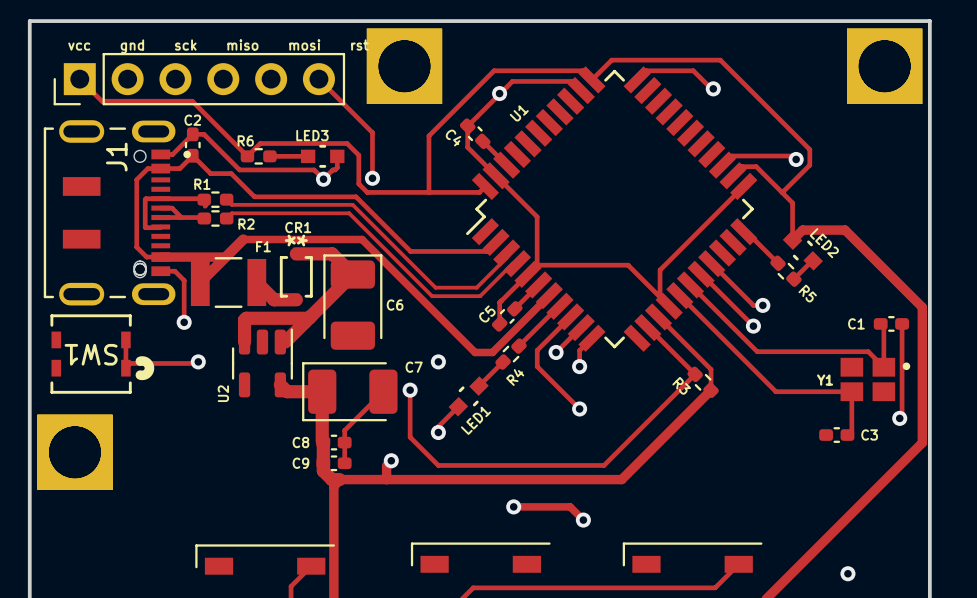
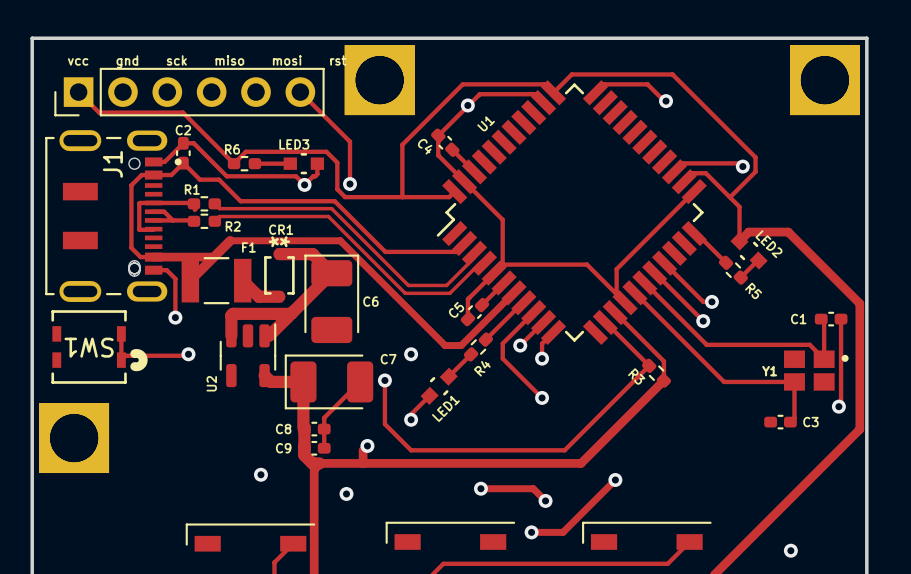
via: none -> (260, 474)
track: none -> (615, 479) (563, 532) (531, 532)
via: none -> (615, 479)
via: none -> (346, 493)
via: none -> (531, 532)

